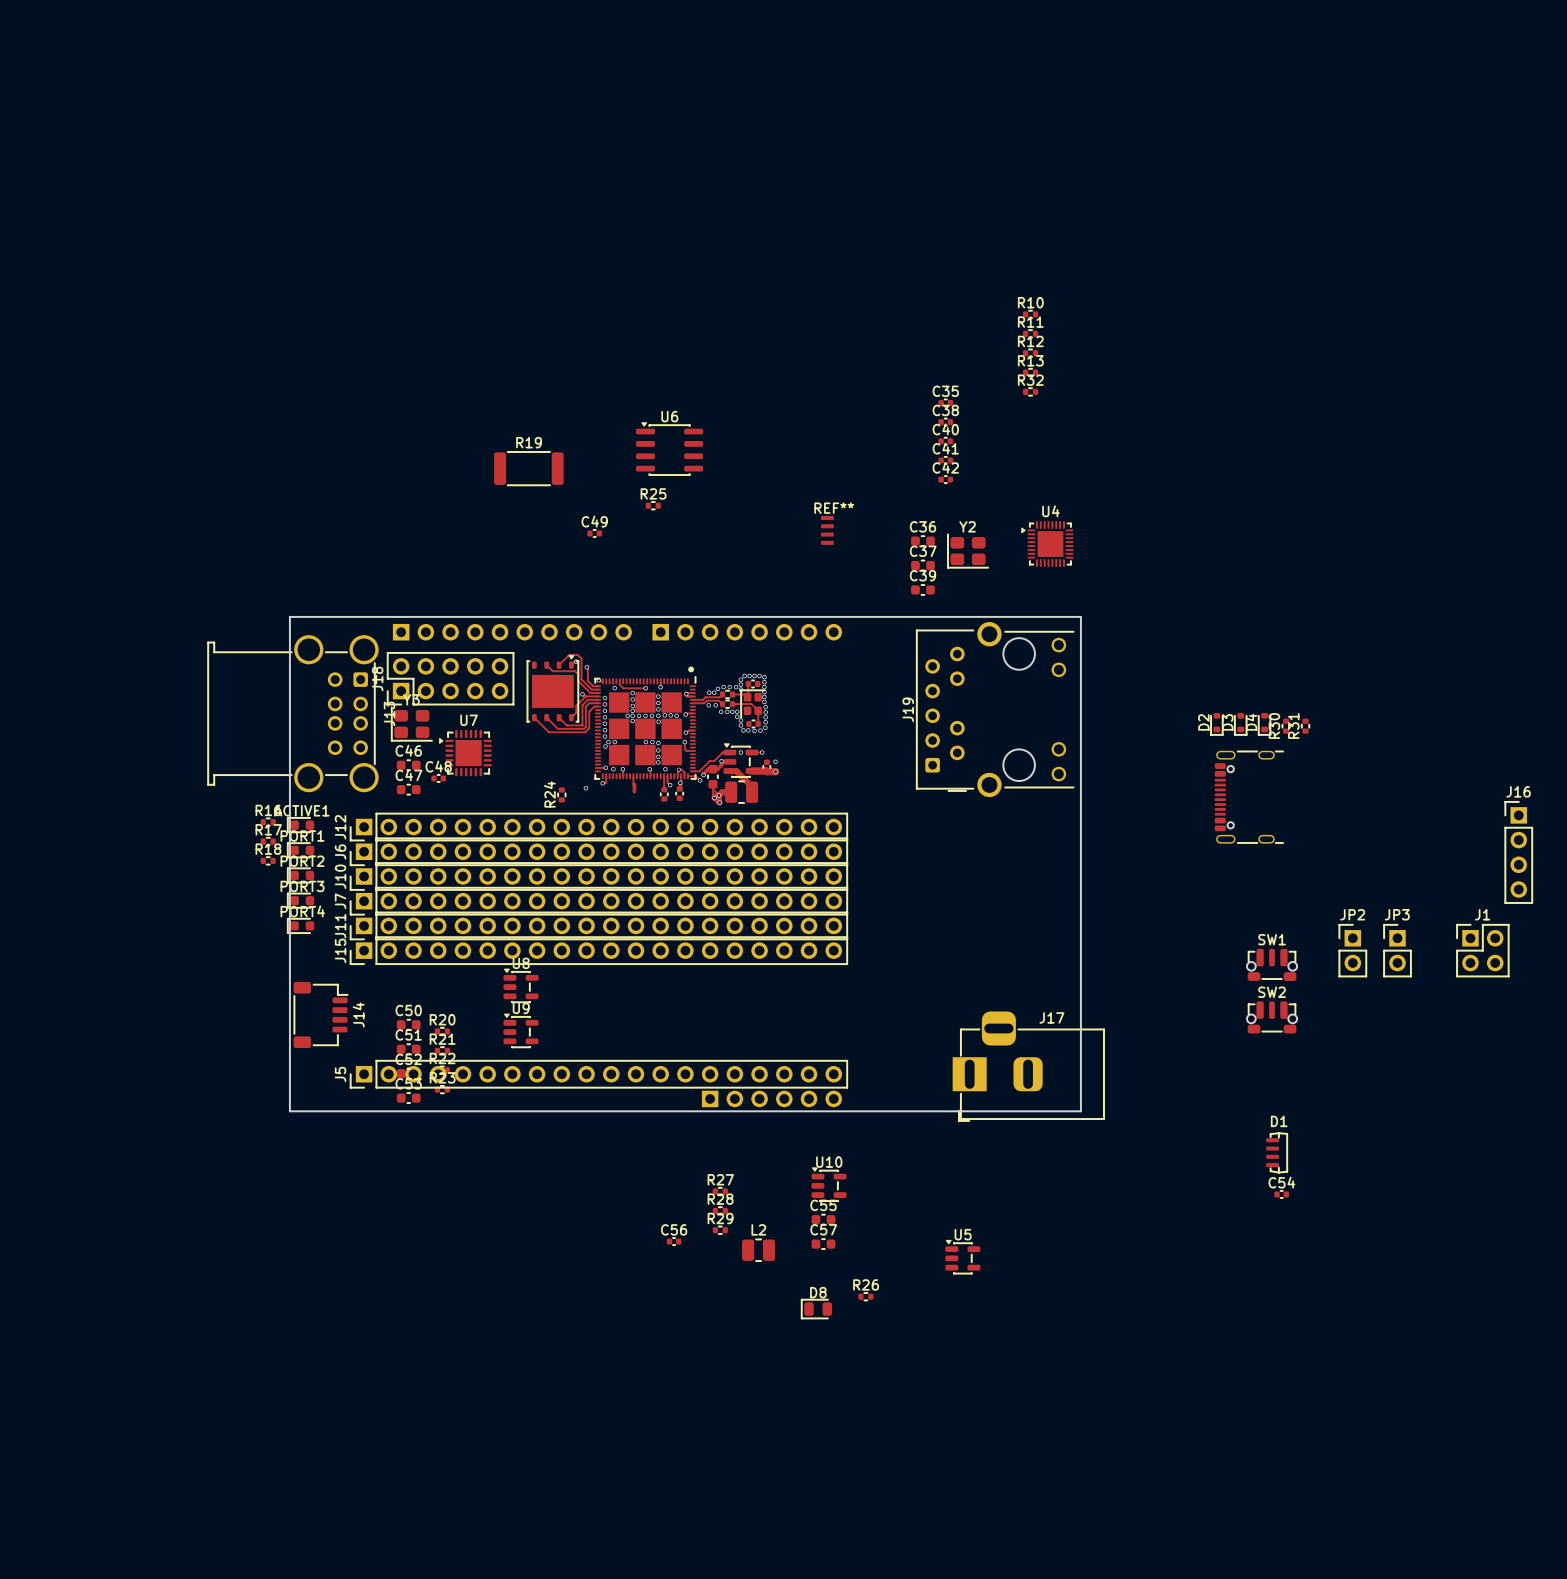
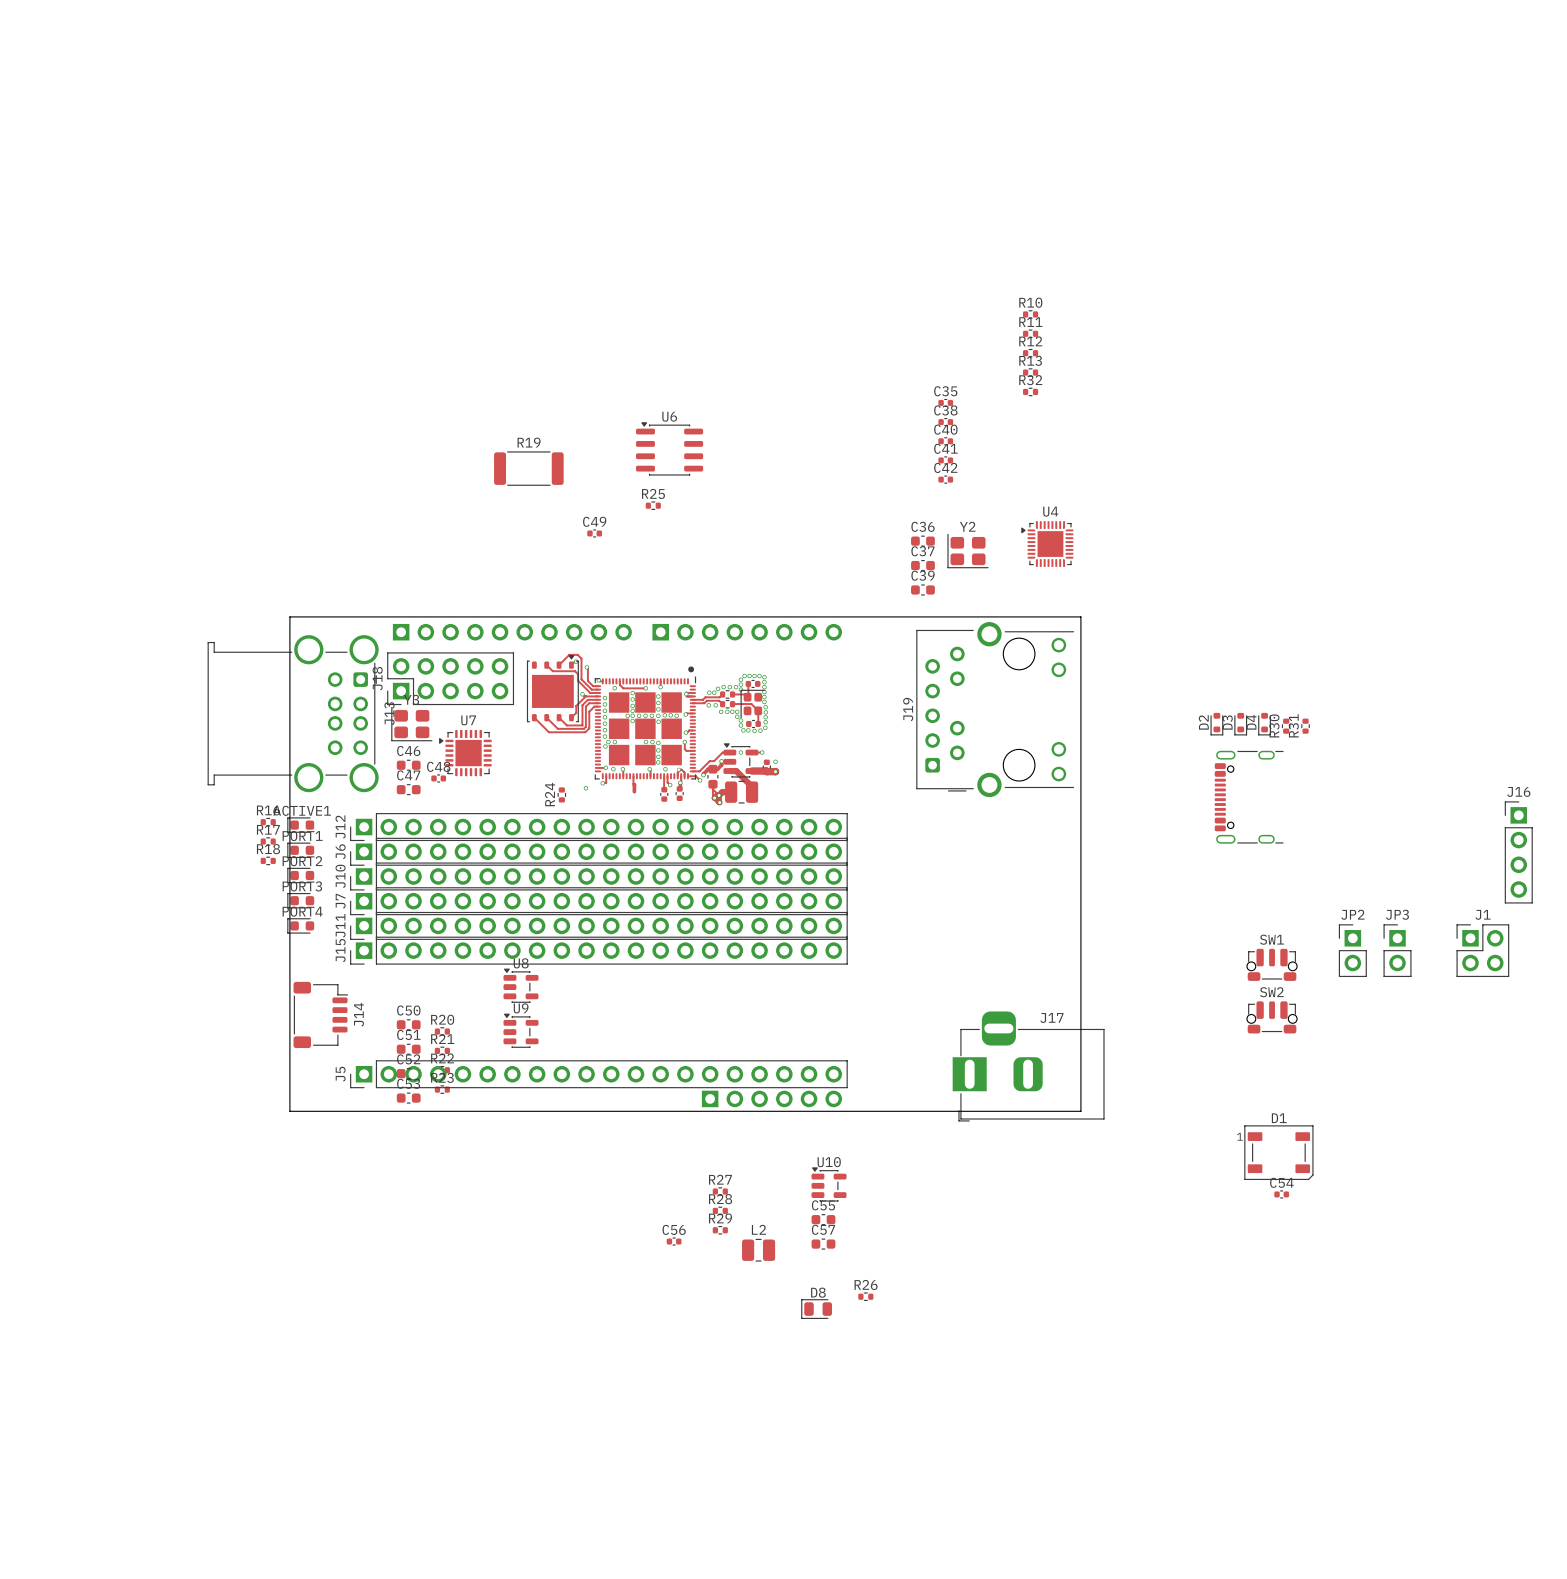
REF**: (827, 530) -> none
D1 footprint: [1266, 1132, 1288, 1174] -> [1244, 1125, 1314, 1181]
U5: (962, 1257) -> none

